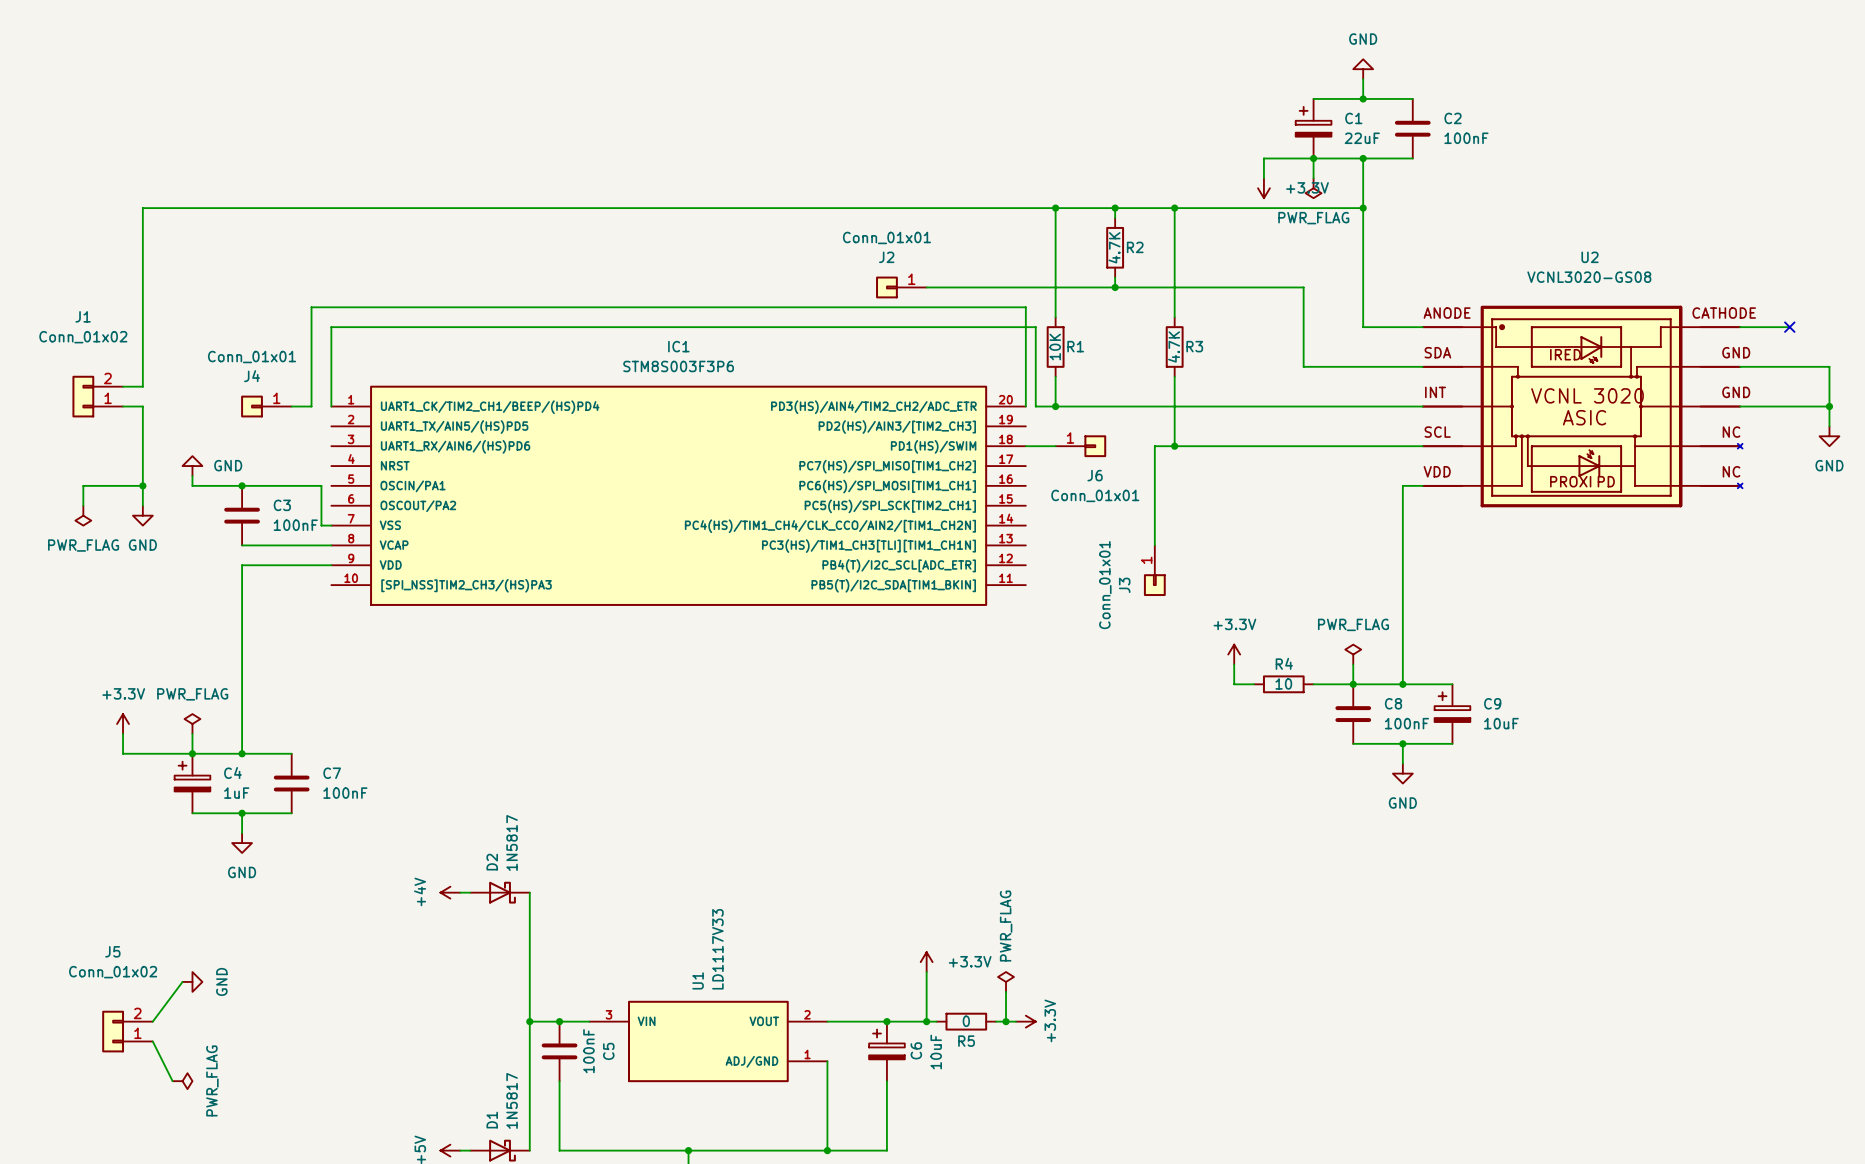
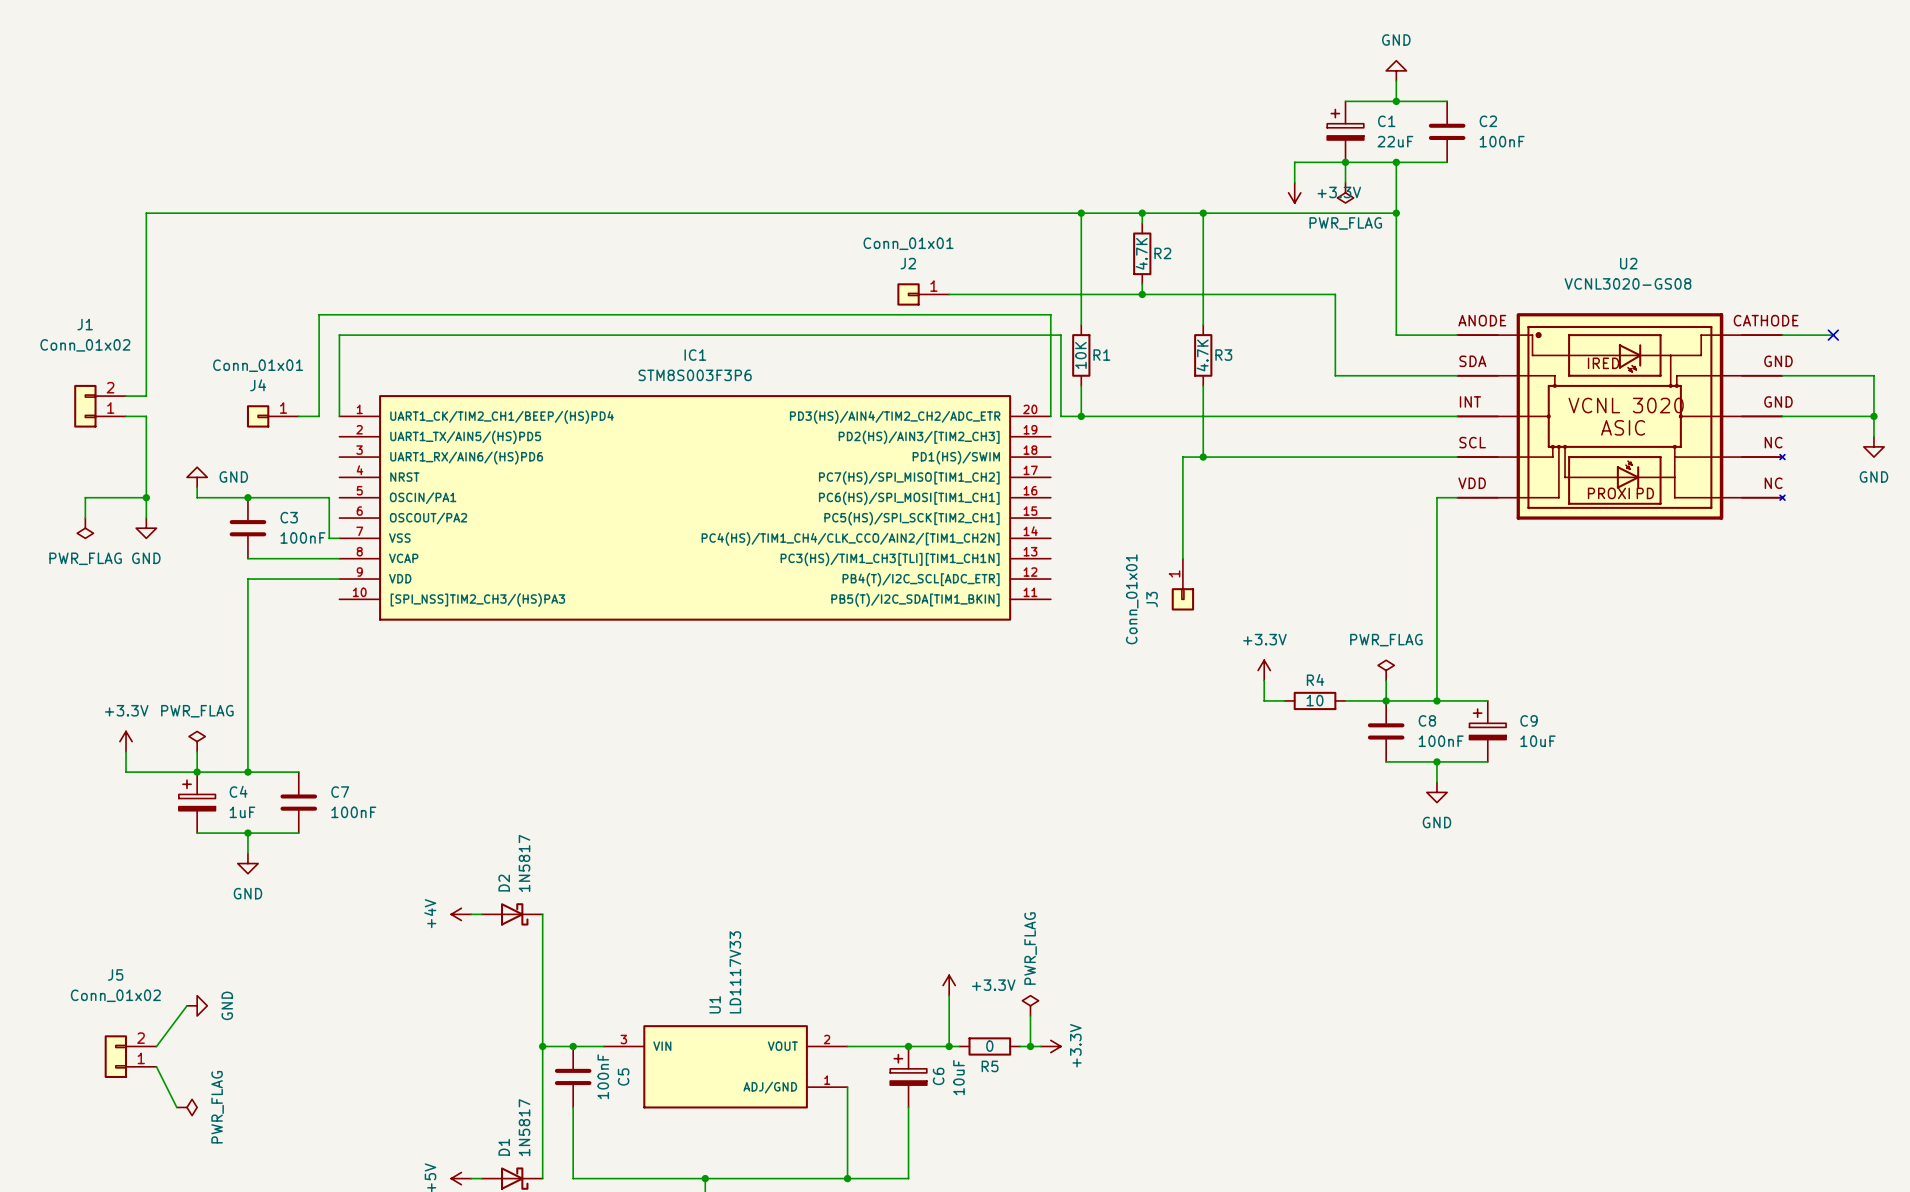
wire: (1025, 446) (1055, 446) -> none
J6: Conn_01x01 (1080, 446) -> none

